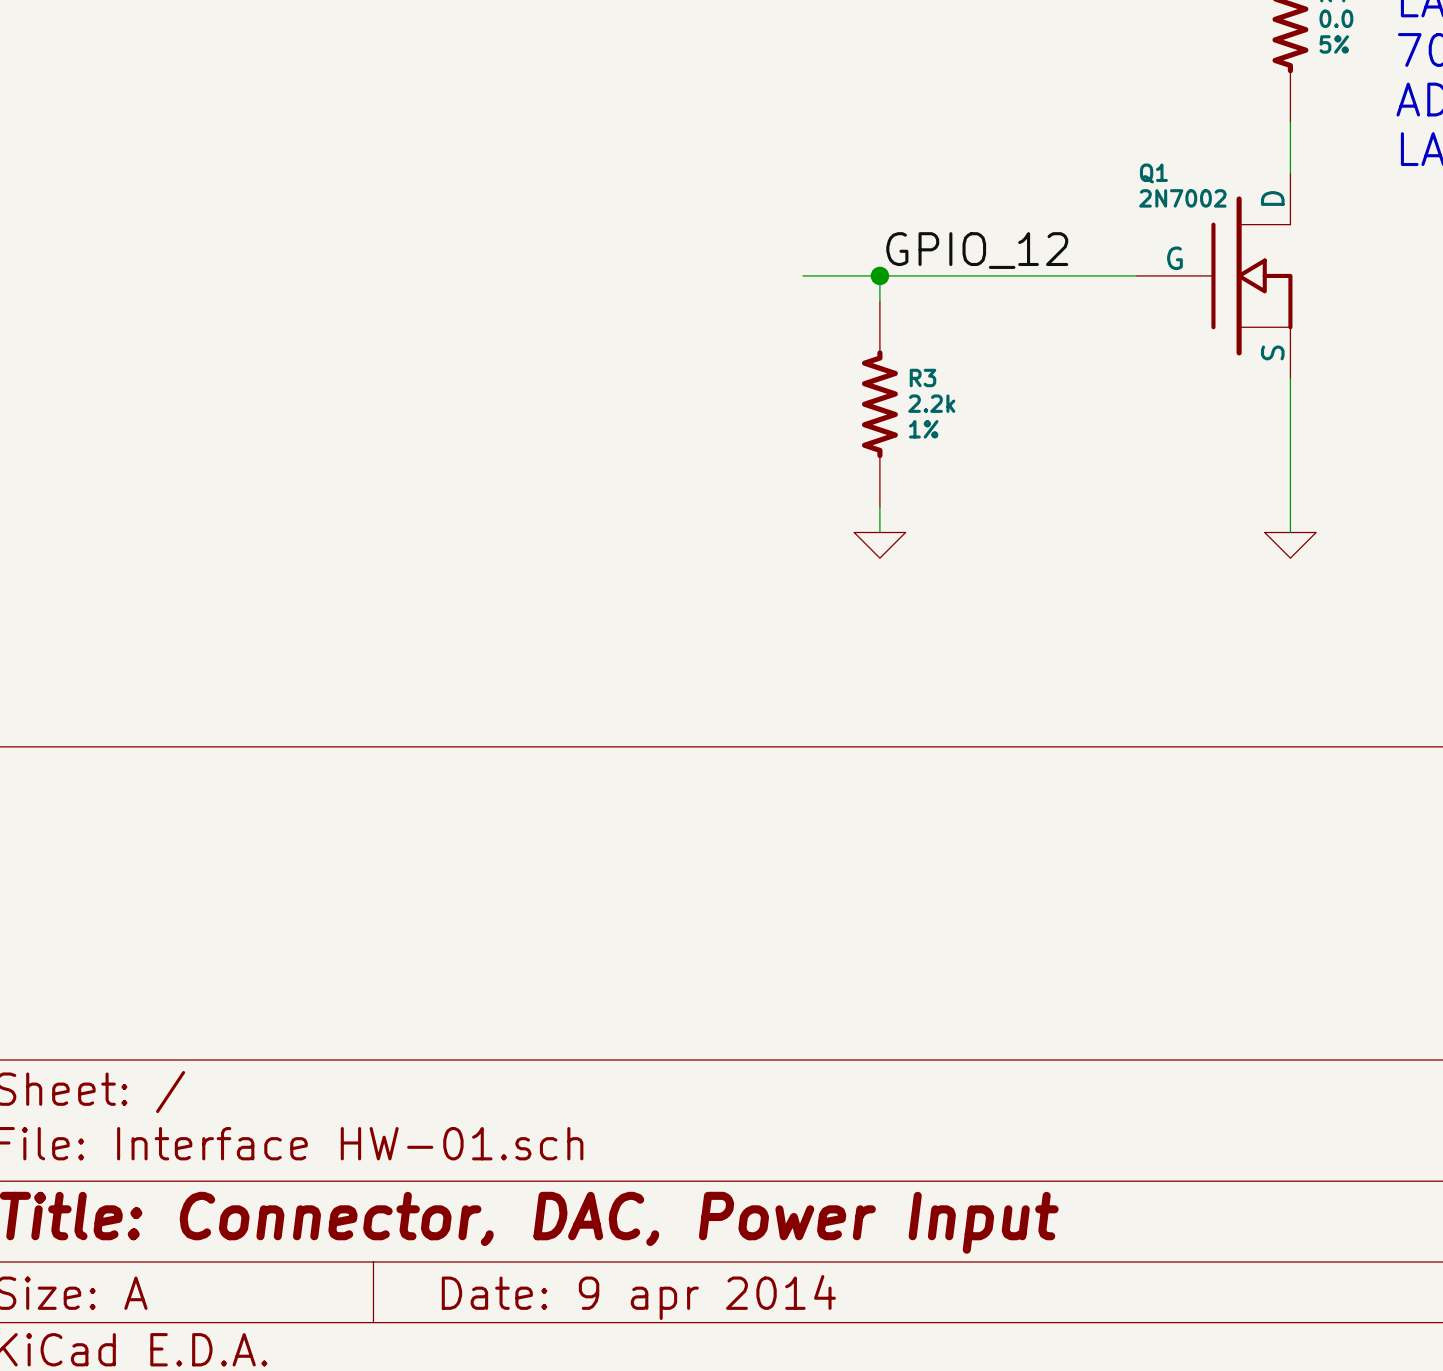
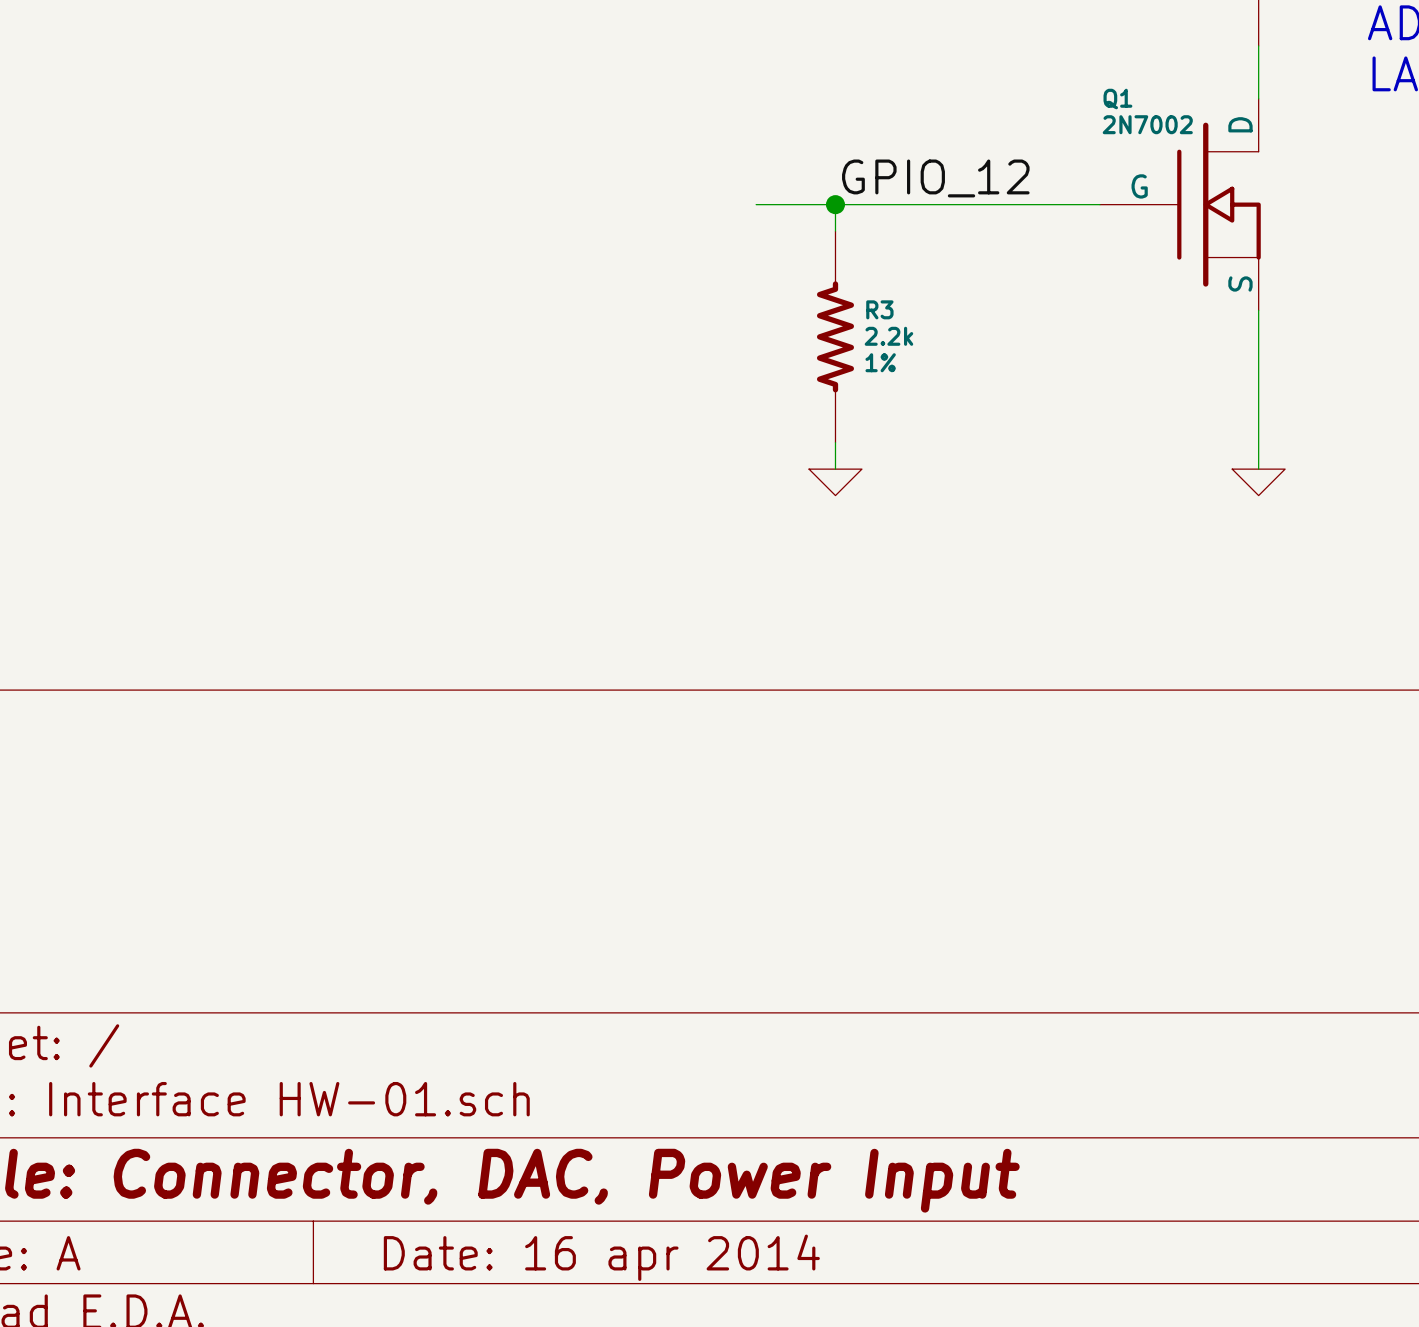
title block: Date: 9 apr 2014 (638, 1297) -> Date: 16 apr 2014 (601, 1257)

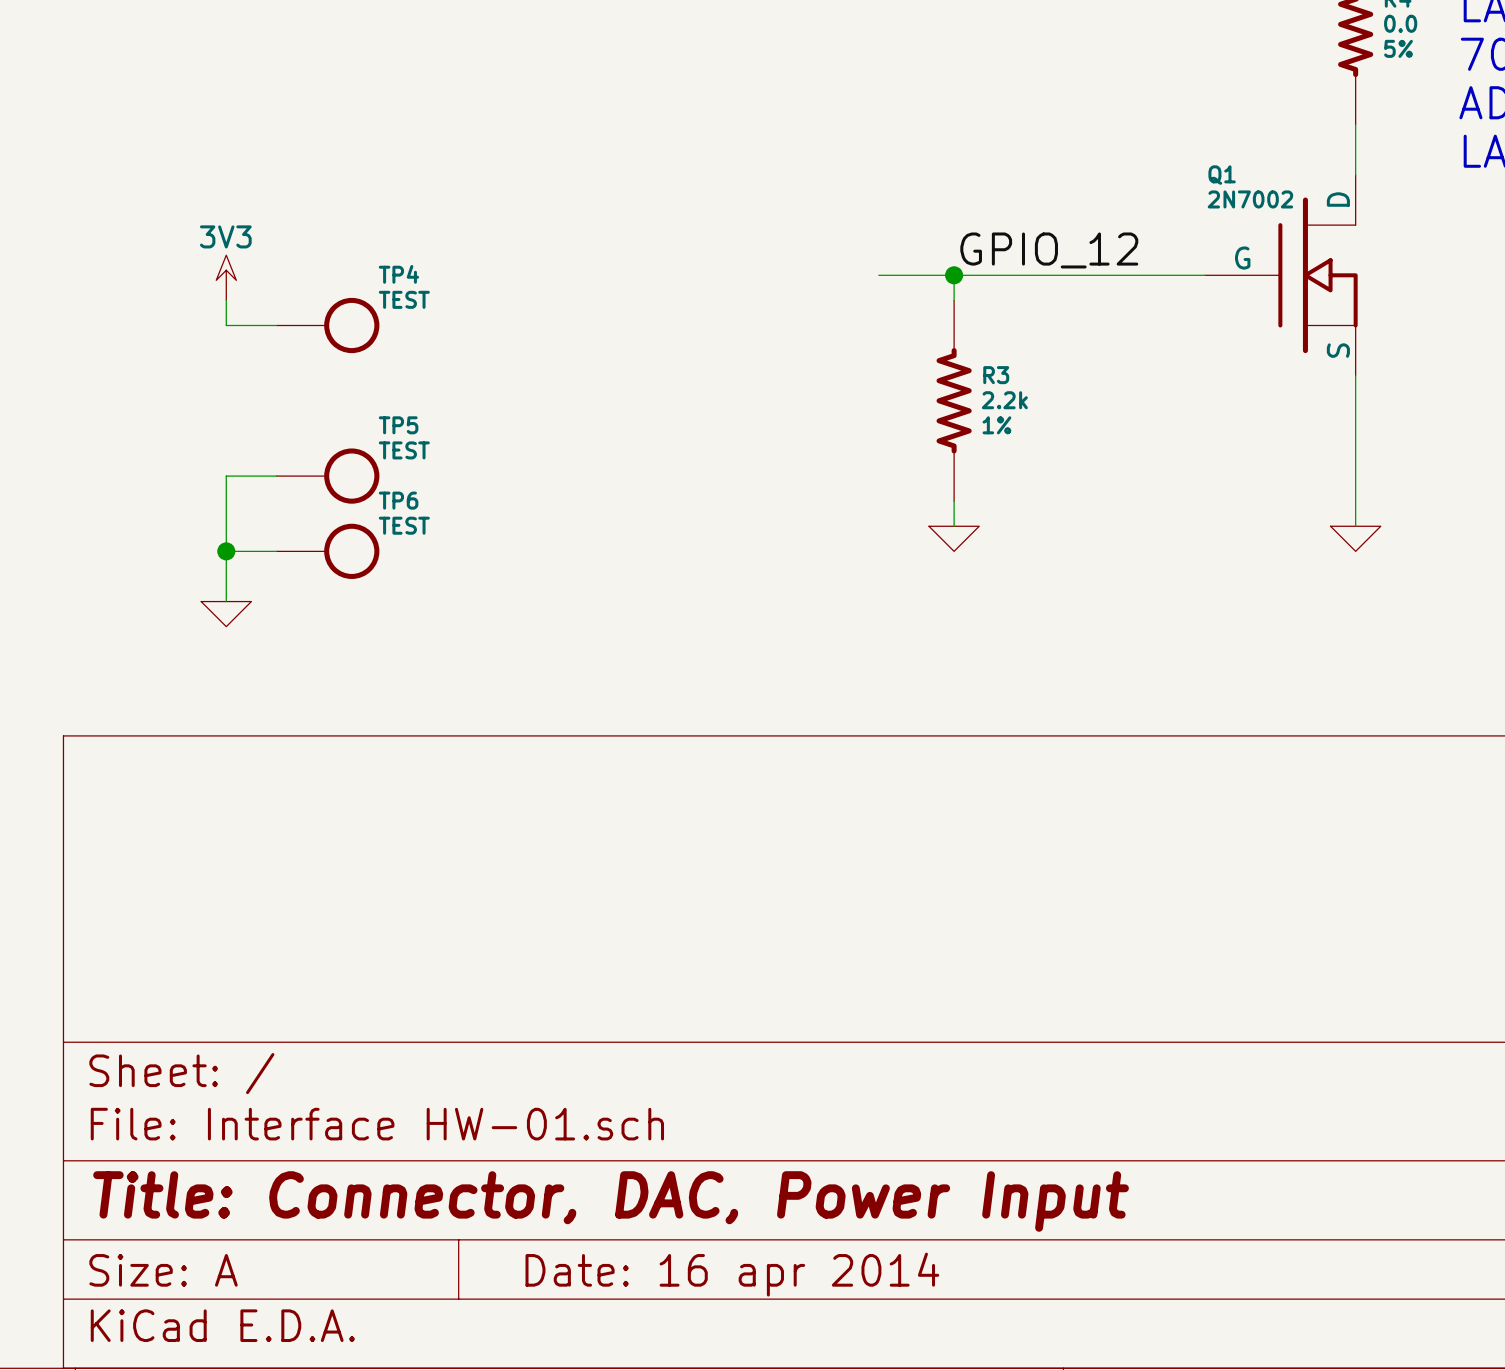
power symbol: none -> 3V3 (226, 277)
wire: none -> (226, 300) (226, 325) (276, 325)
TP4: none -> TEST (327, 325)
wire: none -> (276, 476) (226, 476) (226, 601)
TP5: none -> TEST (327, 476)
wire: none -> (226, 551) (276, 551)
junction: none -> (226, 551)
TP6: none -> TEST (327, 551)
power symbol: none -> (226, 614)

